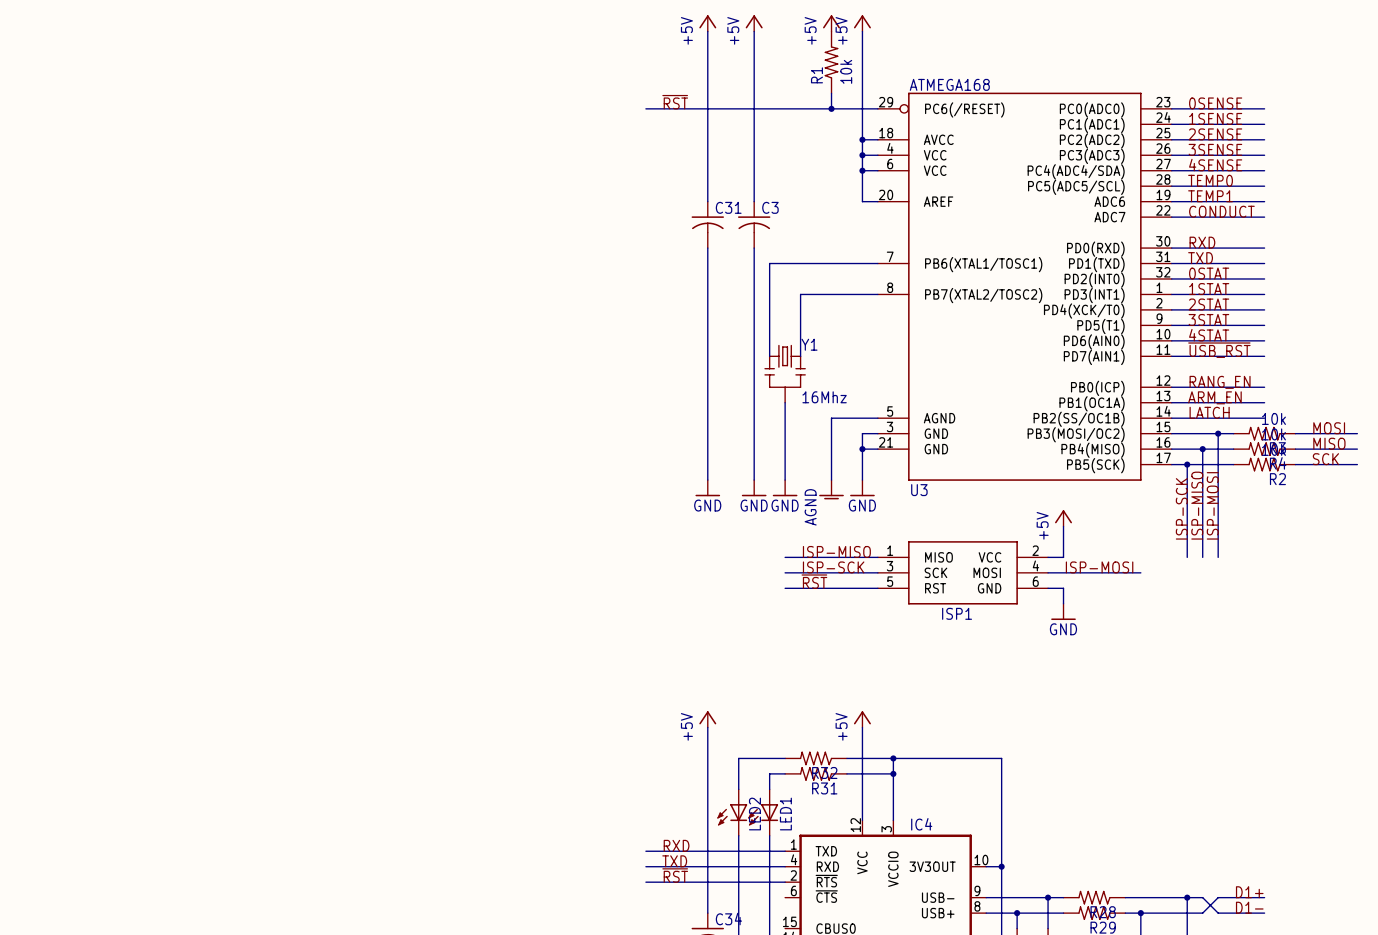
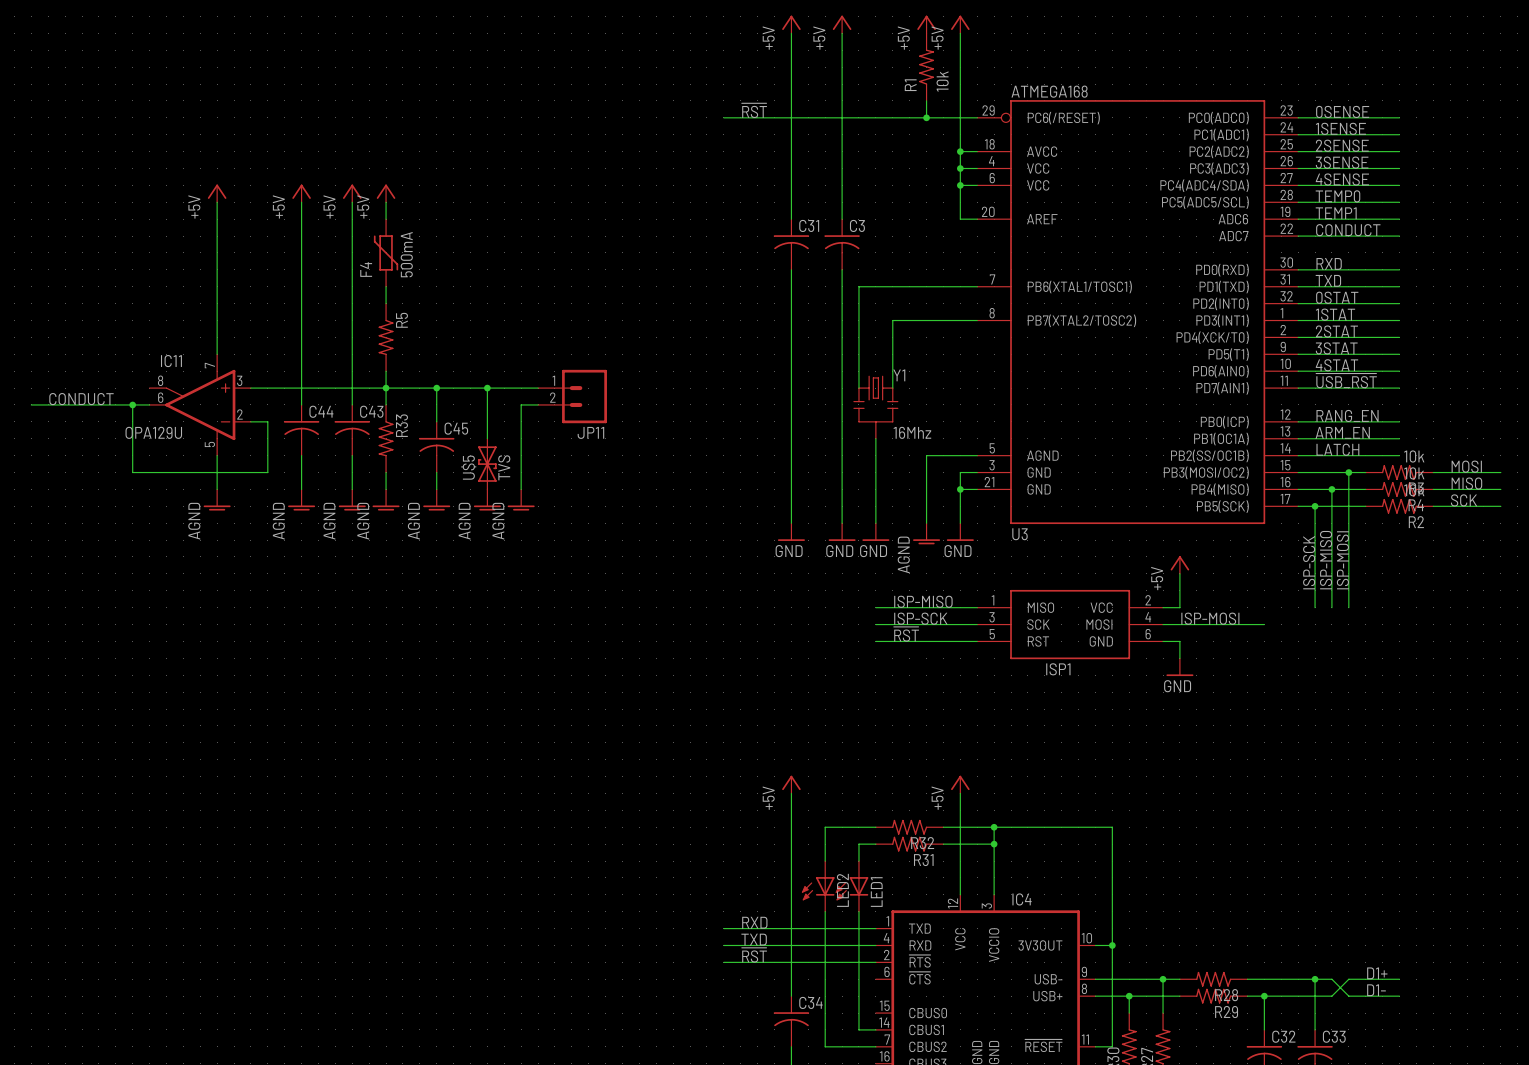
power symbol: none -> +5V (217, 193)
power symbol: none -> +5V (301, 193)
power symbol: none -> +5V (352, 193)
power symbol: none -> +5V (386, 193)
wire: none -> (217, 202) (217, 354)
wire: none -> (301, 202) (301, 404)
wire: none -> (352, 202) (352, 404)
wire: none -> (386, 202) (386, 219)
F4: none -> 500mA (386, 252)
wire: none -> (386, 286) (386, 303)
R5: none -> (386, 337)
wire: none -> (386, 371) (386, 404)
wire: none -> (250, 388) (538, 388)
junction: none -> (386, 388)
wire: none -> (436, 388) (436, 421)
junction: none -> (436, 388)
wire: none -> (487, 388) (487, 438)
junction: none -> (487, 388)
JP11: none -> (572, 396)
label: none -> CONDUCT (81, 399)
wire: none -> (31, 404) (149, 404)
wire: none -> (132, 404) (132, 472) (267, 472) (267, 421) (250, 421)
junction: none -> (132, 404)
IC11: none -> OPA129U (200, 404)
wire: none -> (538, 404) (521, 404) (521, 489)
C44: none -> (301, 430)
C43: none -> (352, 430)
R33: none -> (386, 438)
C45: none -> (436, 447)
wire: none -> (217, 455) (217, 489)
wire: none -> (301, 455) (301, 489)
wire: none -> (352, 455) (352, 489)
U$5: none -> TVS (487, 464)
wire: none -> (386, 472) (386, 489)
wire: none -> (436, 472) (436, 489)
power symbol: none -> AGND (217, 499)
power symbol: none -> AGND (301, 499)
power symbol: none -> AGND (352, 499)
power symbol: none -> AGND (386, 499)
power symbol: none -> AGND (436, 499)
power symbol: none -> AGND (487, 499)
power symbol: none -> AGND (521, 499)

